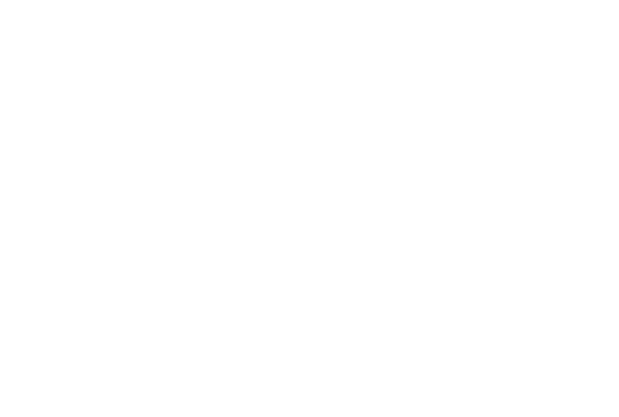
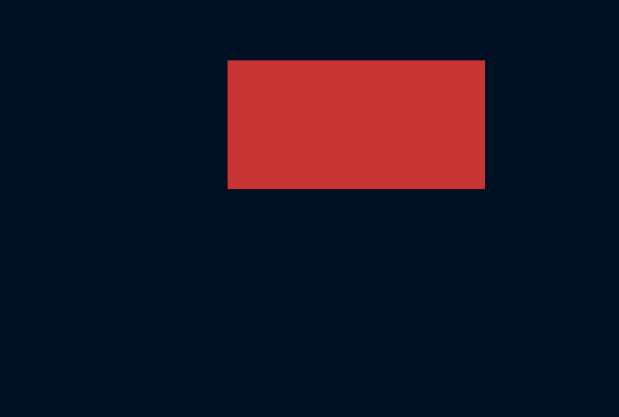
drawing: none -> [227, 60, 486, 190]

